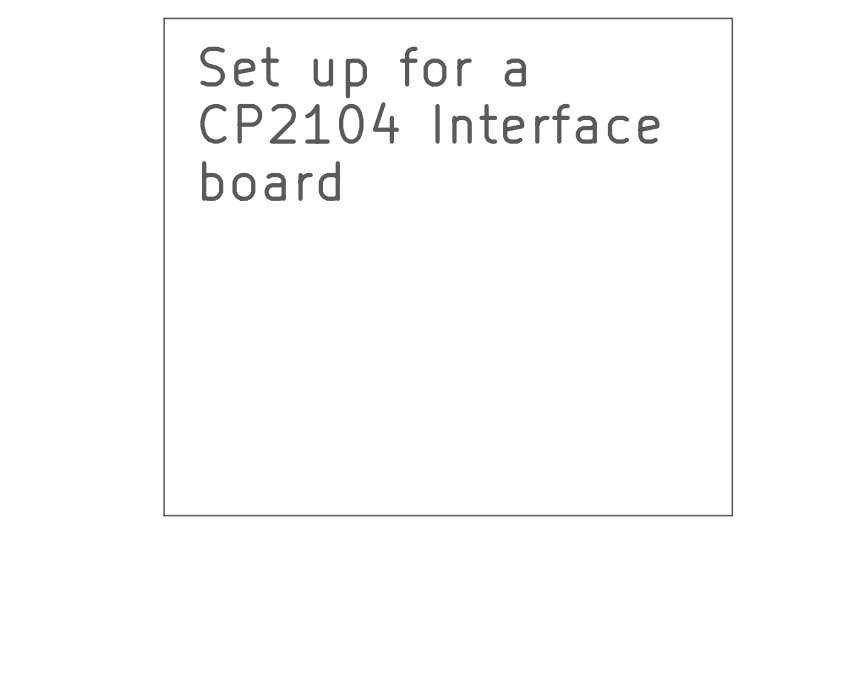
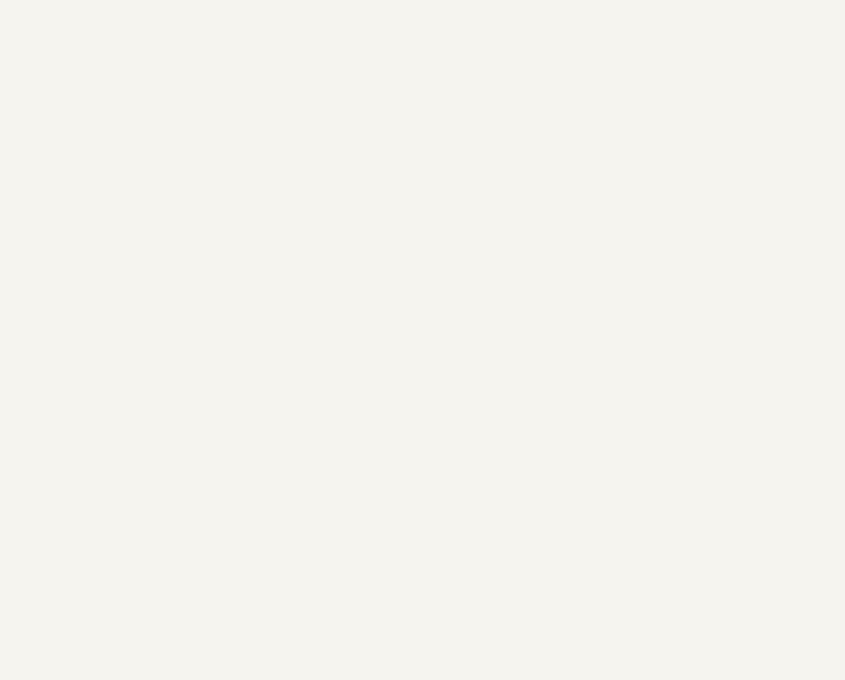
line: (164, 18) (732, 18) (732, 515) (164, 515) (164, 18) -> none
text: Set up for a (363, 72) -> none
text: CP2104 Interface (429, 122) -> none
text: board (270, 180) -> none

